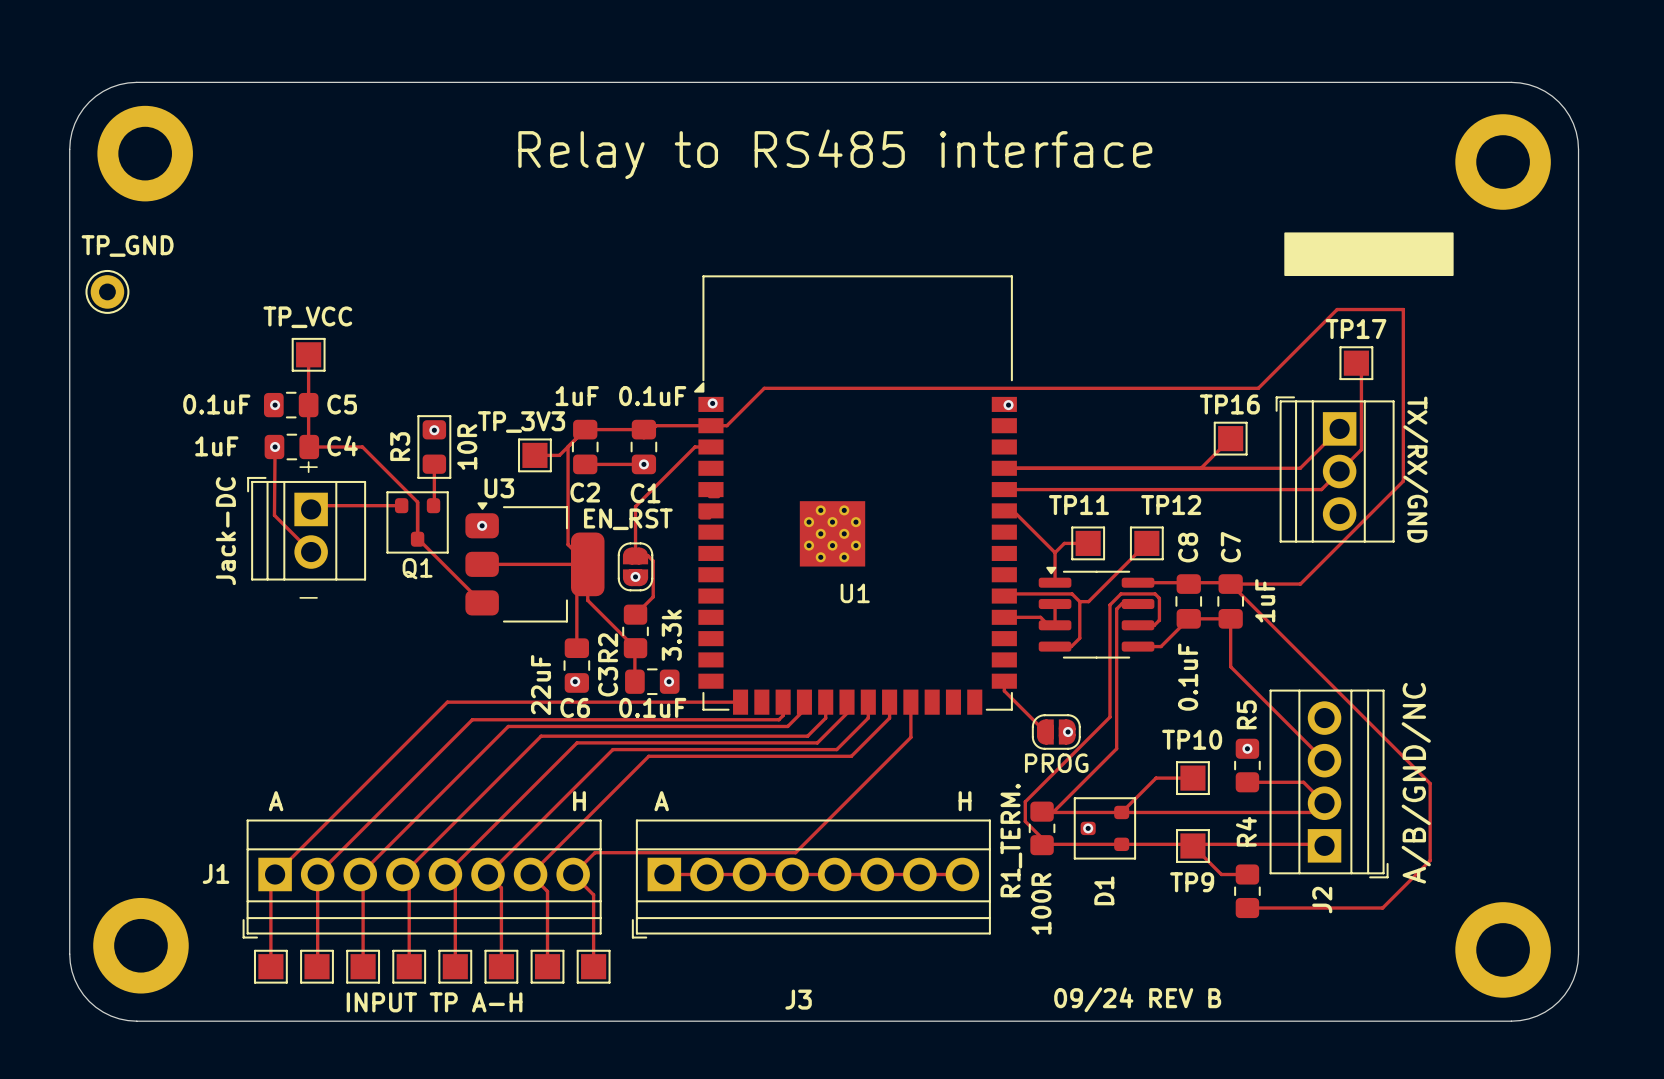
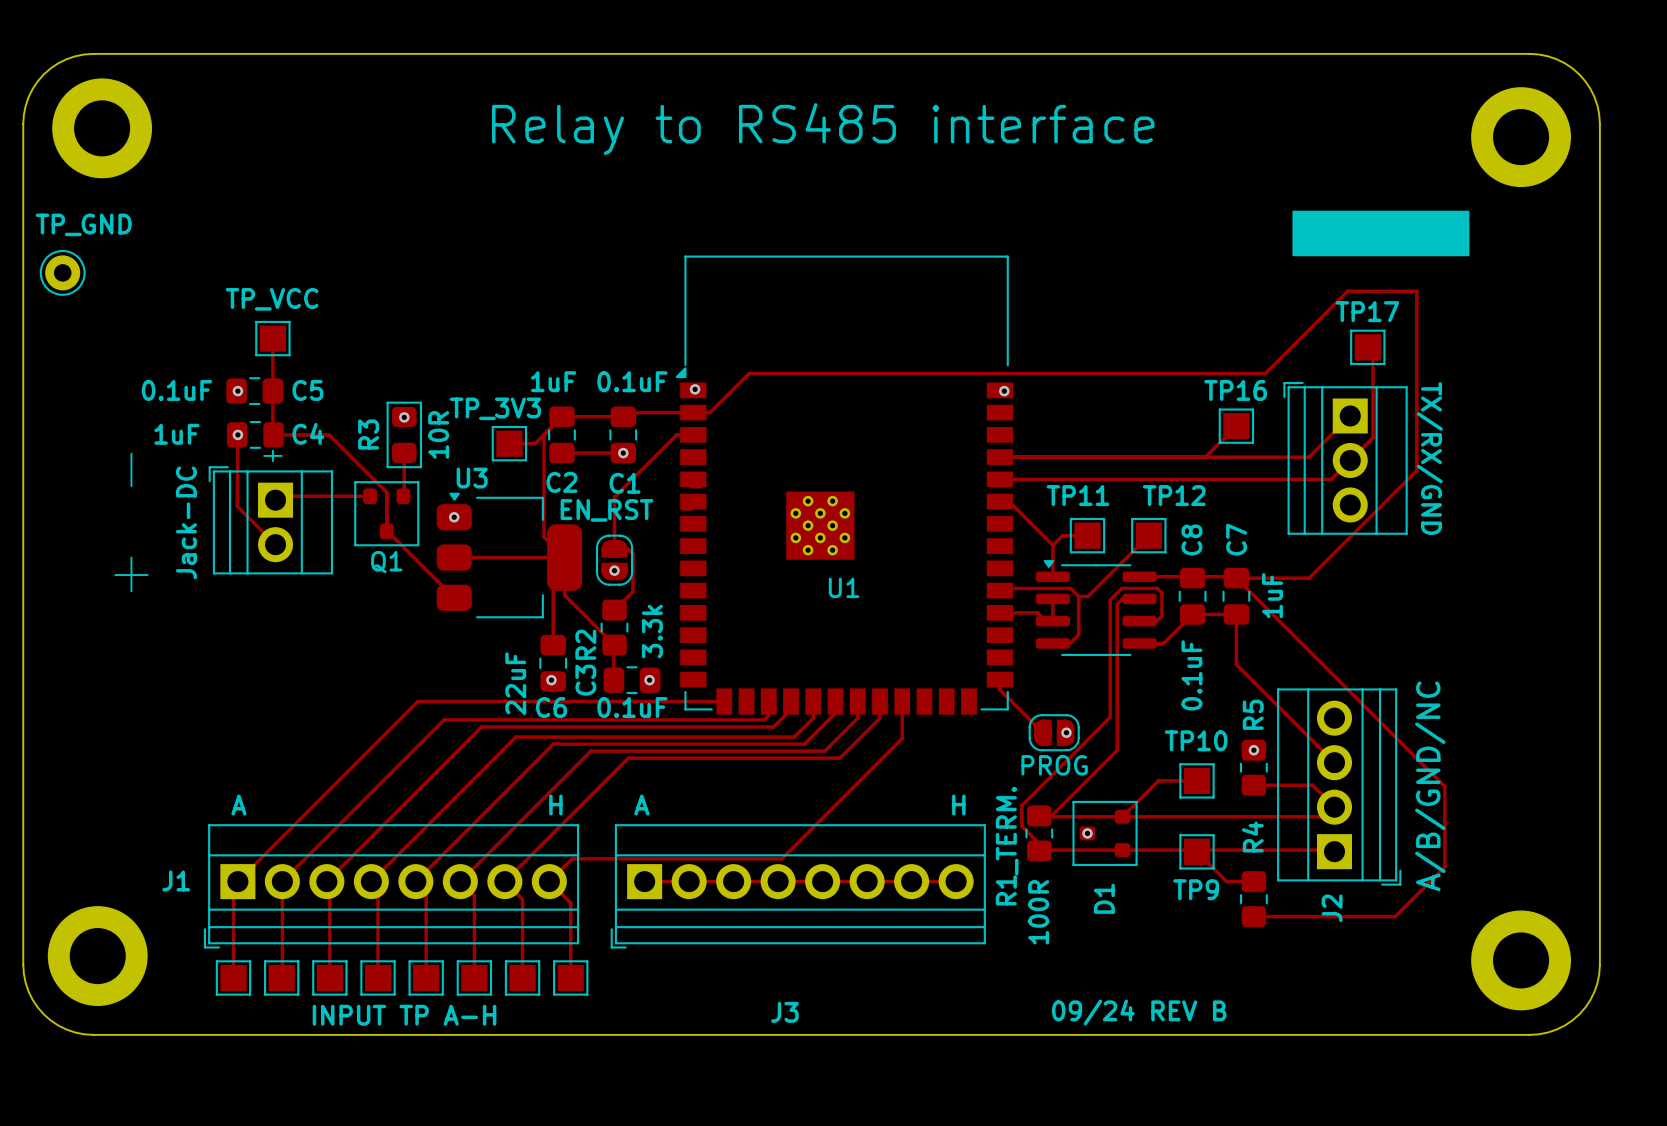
line: none -> (131, 453) (131, 486)
line: none -> (131, 557) (131, 591)
line: none -> (115, 575) (147, 575)
line: (300, 597) (317, 597) -> none

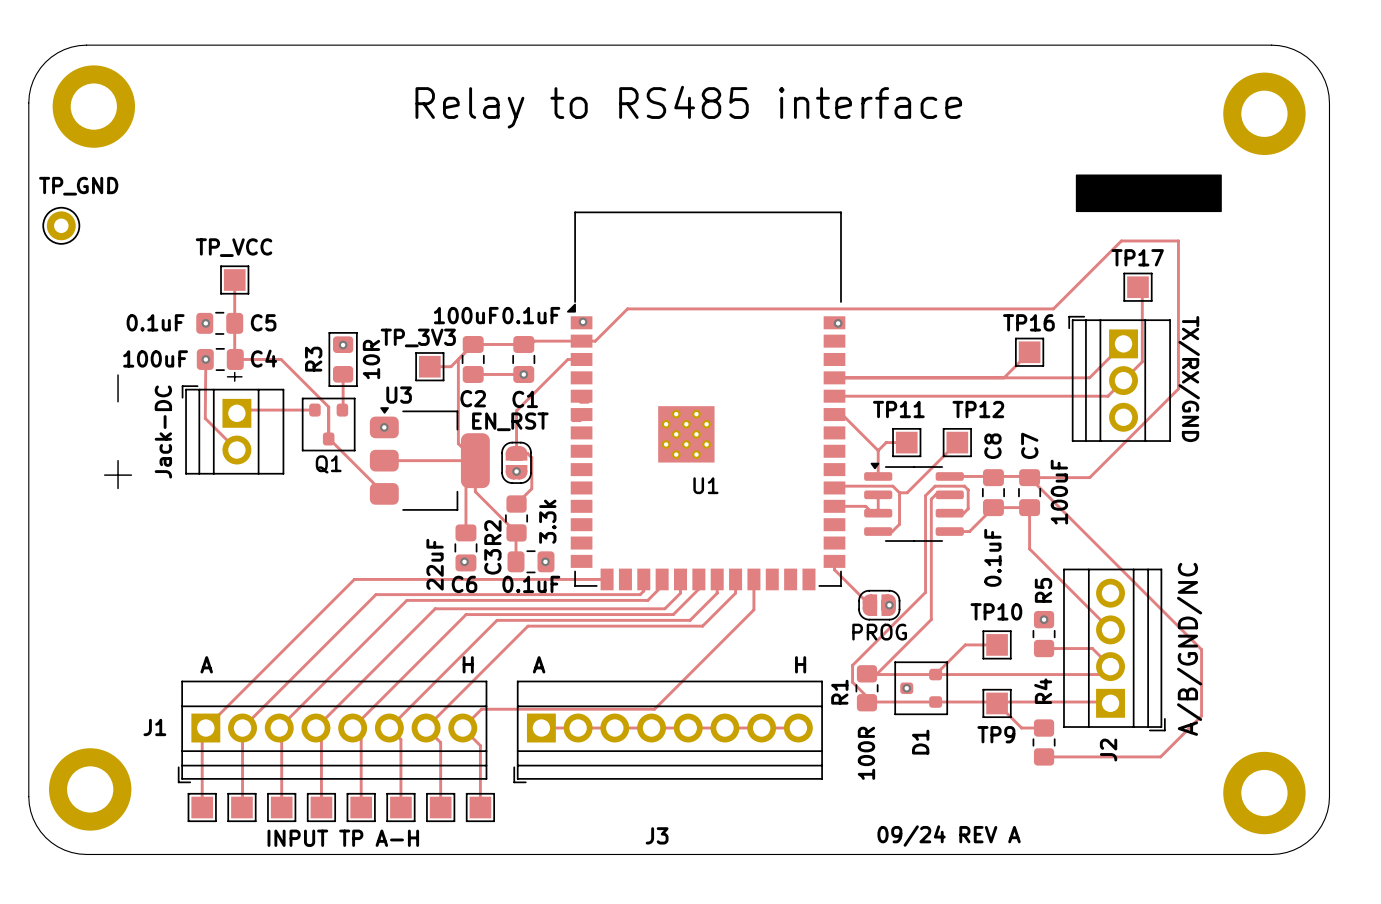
C2 value: 1uF (553, 381) -> 100uF (466, 315)
C4 value: 1uF (176, 434) -> 100uF (155, 358)
C7 value: 1uF (1272, 595) -> 100uF (1059, 492)
R1_TERM. name: R1_TERM. (1007, 846) -> R1 (839, 692)
text: 09/24 REV B (1139, 1012) -> 09/24 REV A (949, 836)

